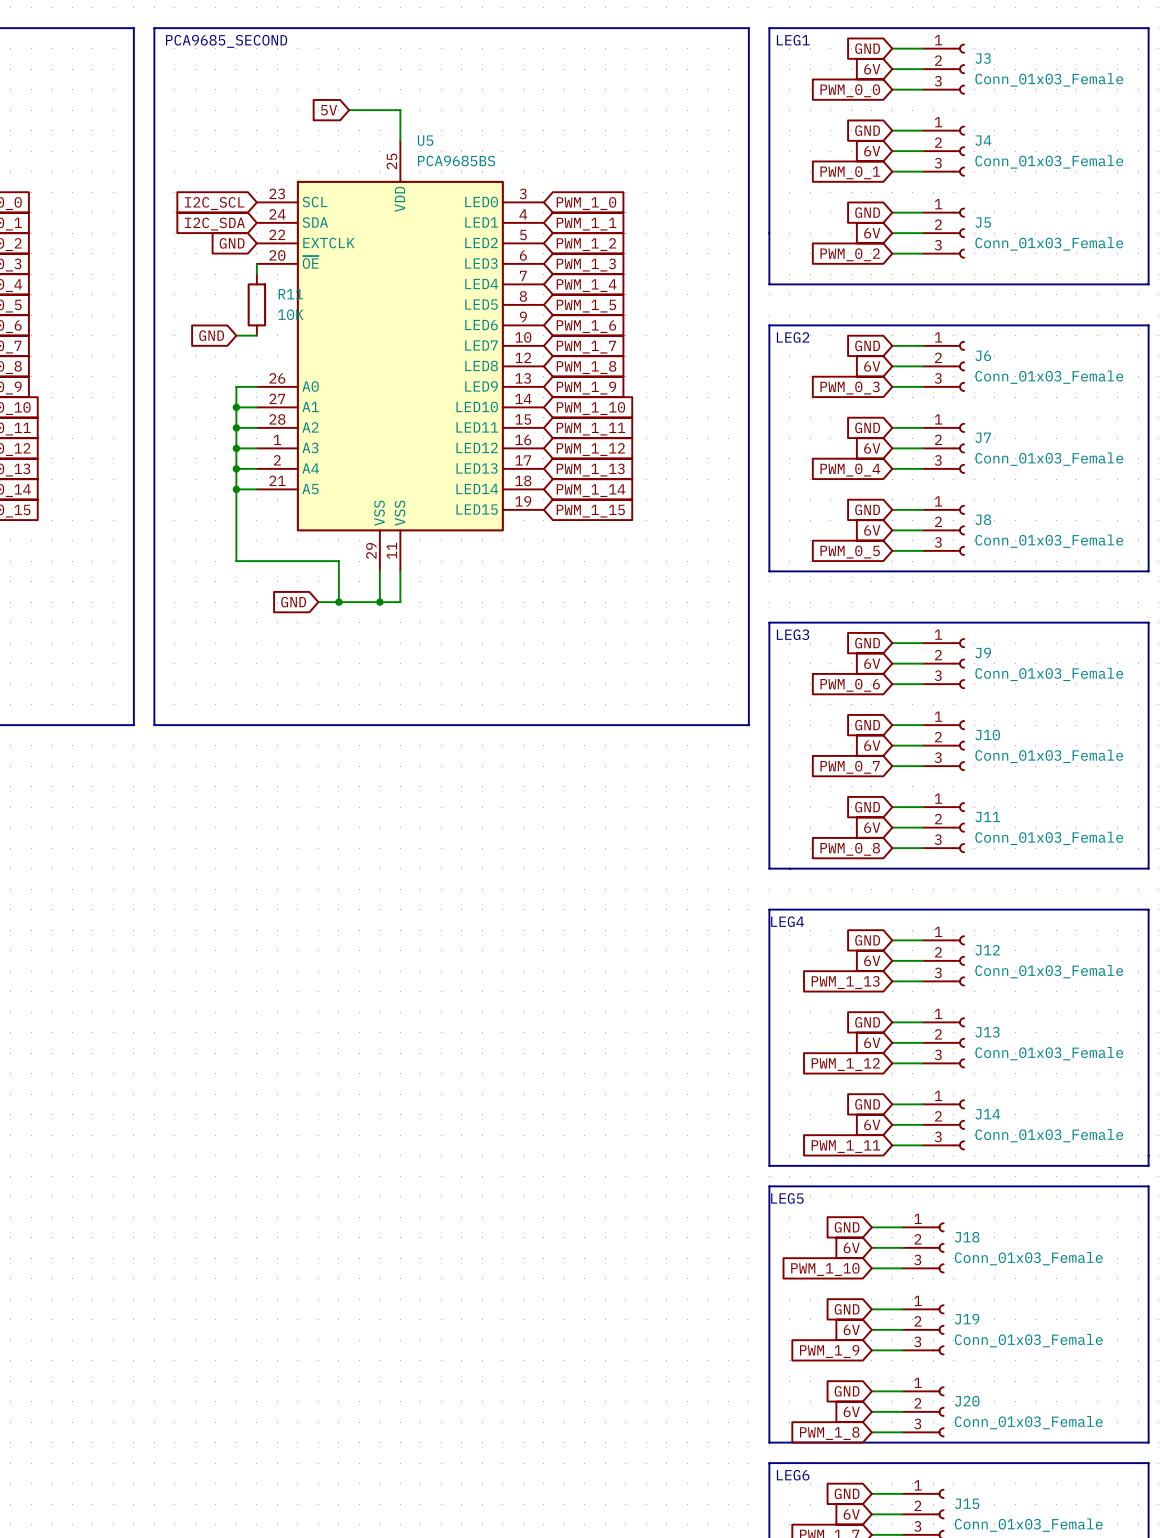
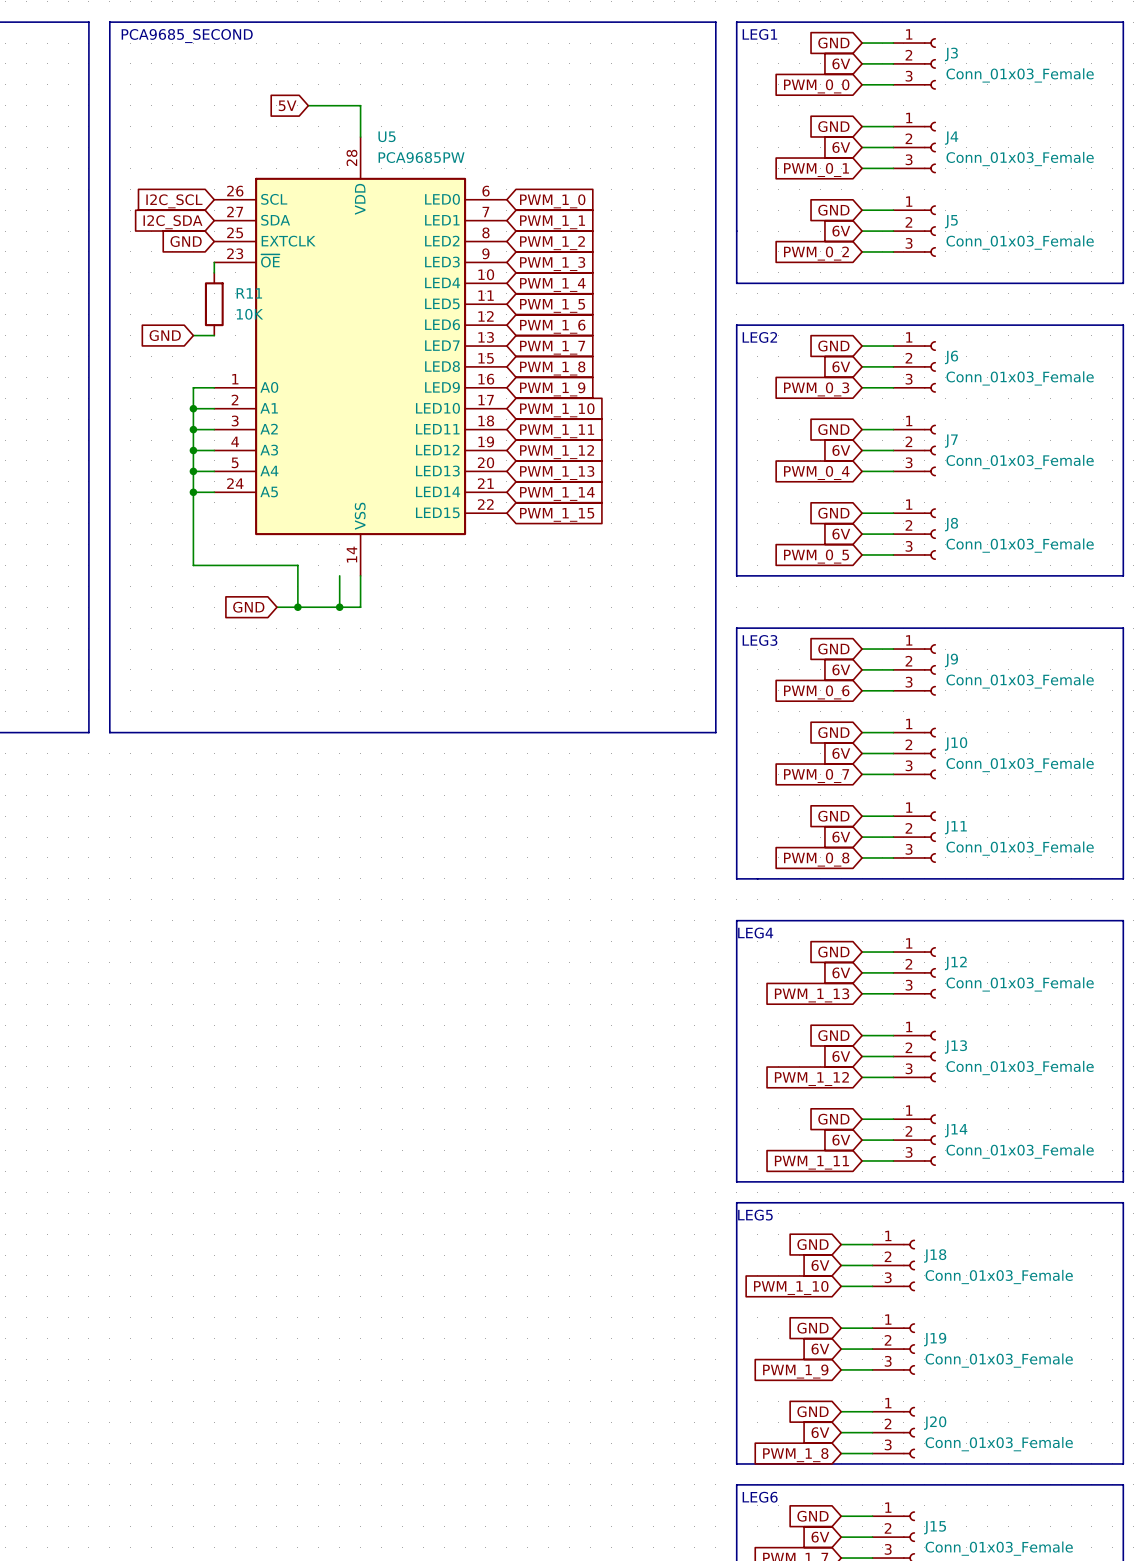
U5 symbol: [256, 140, 544, 572] -> [214, 137, 507, 576]
U5 value: PCA9685BS (456, 161) -> PCA9685PW (421, 157)

